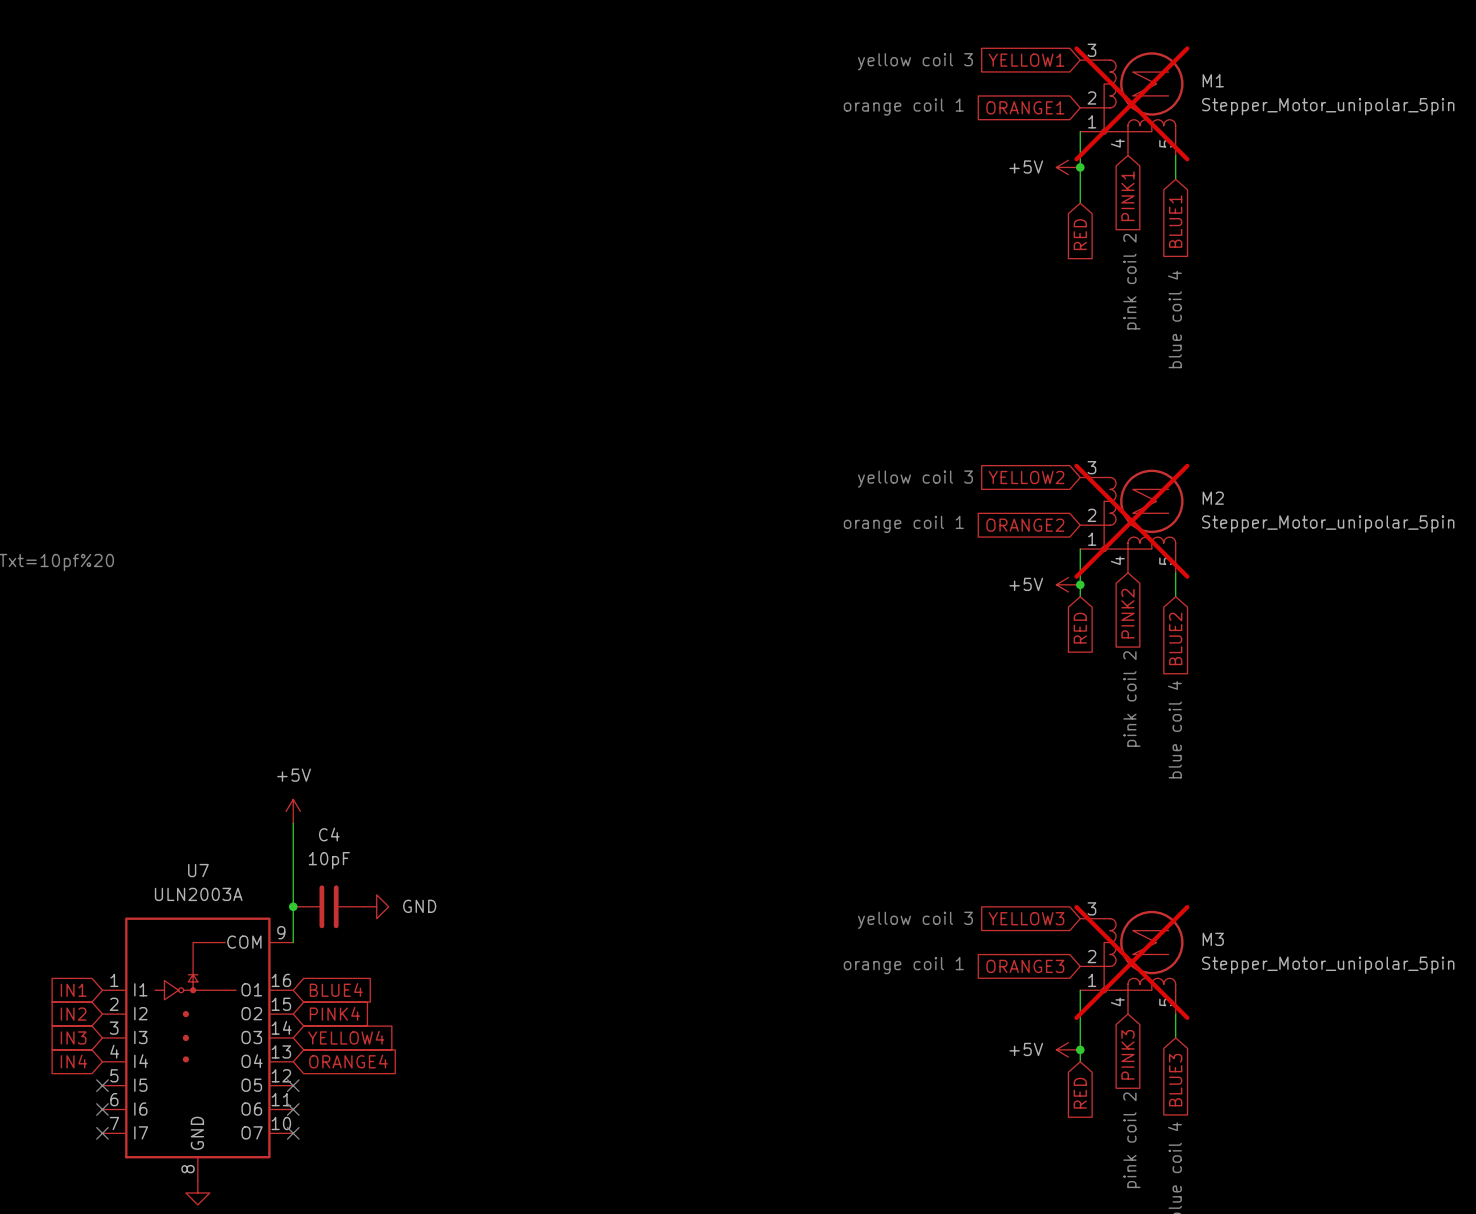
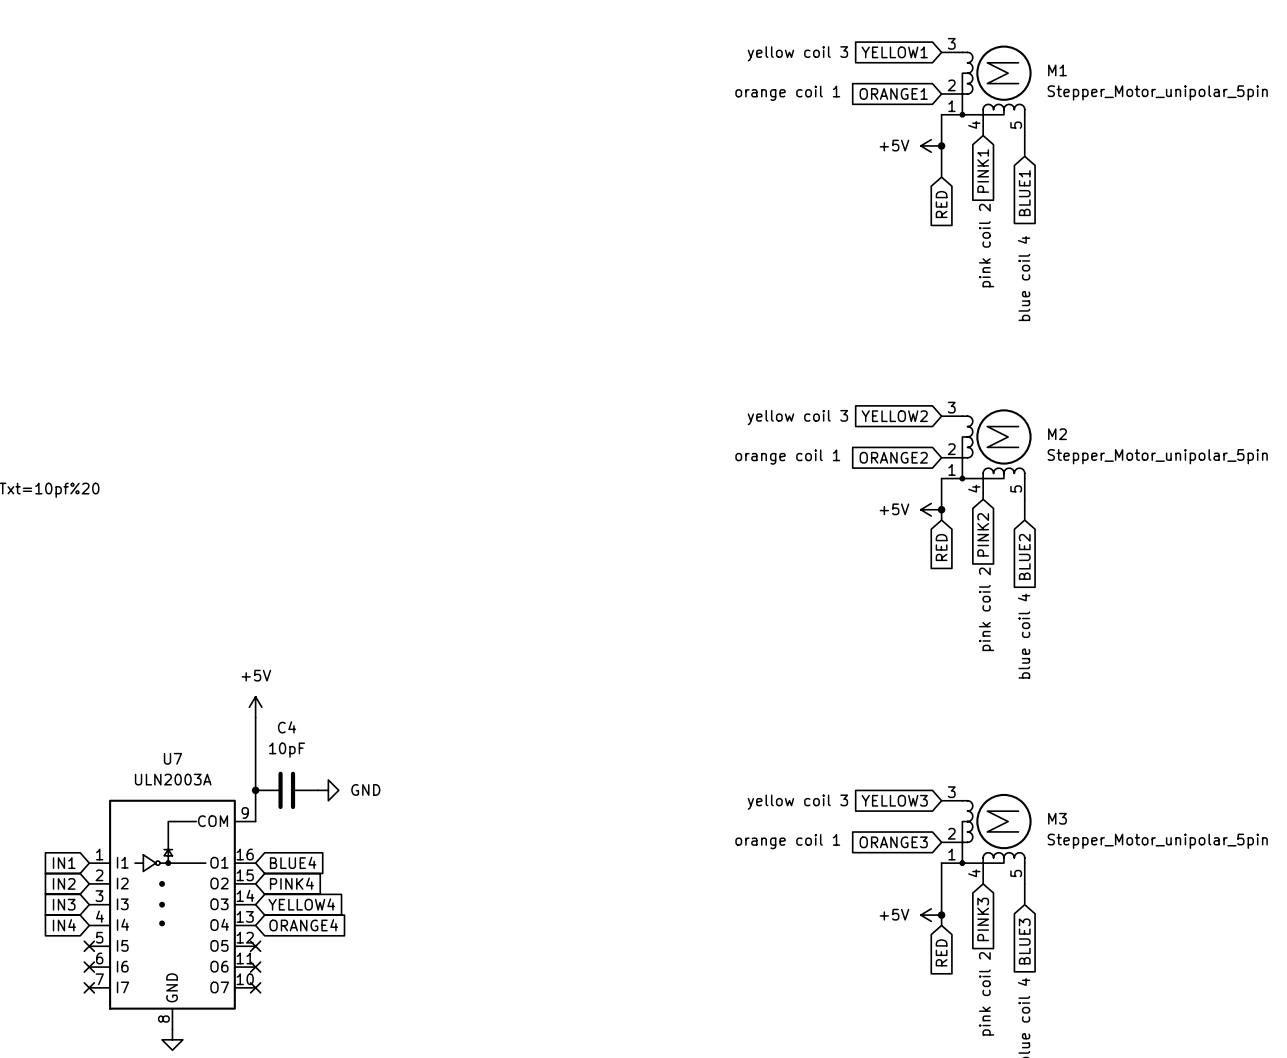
M1 do-not-place cross: (1131, 103) -> none
M2 do-not-place cross: (1131, 521) -> none
M3 do-not-place cross: (1131, 962) -> none

